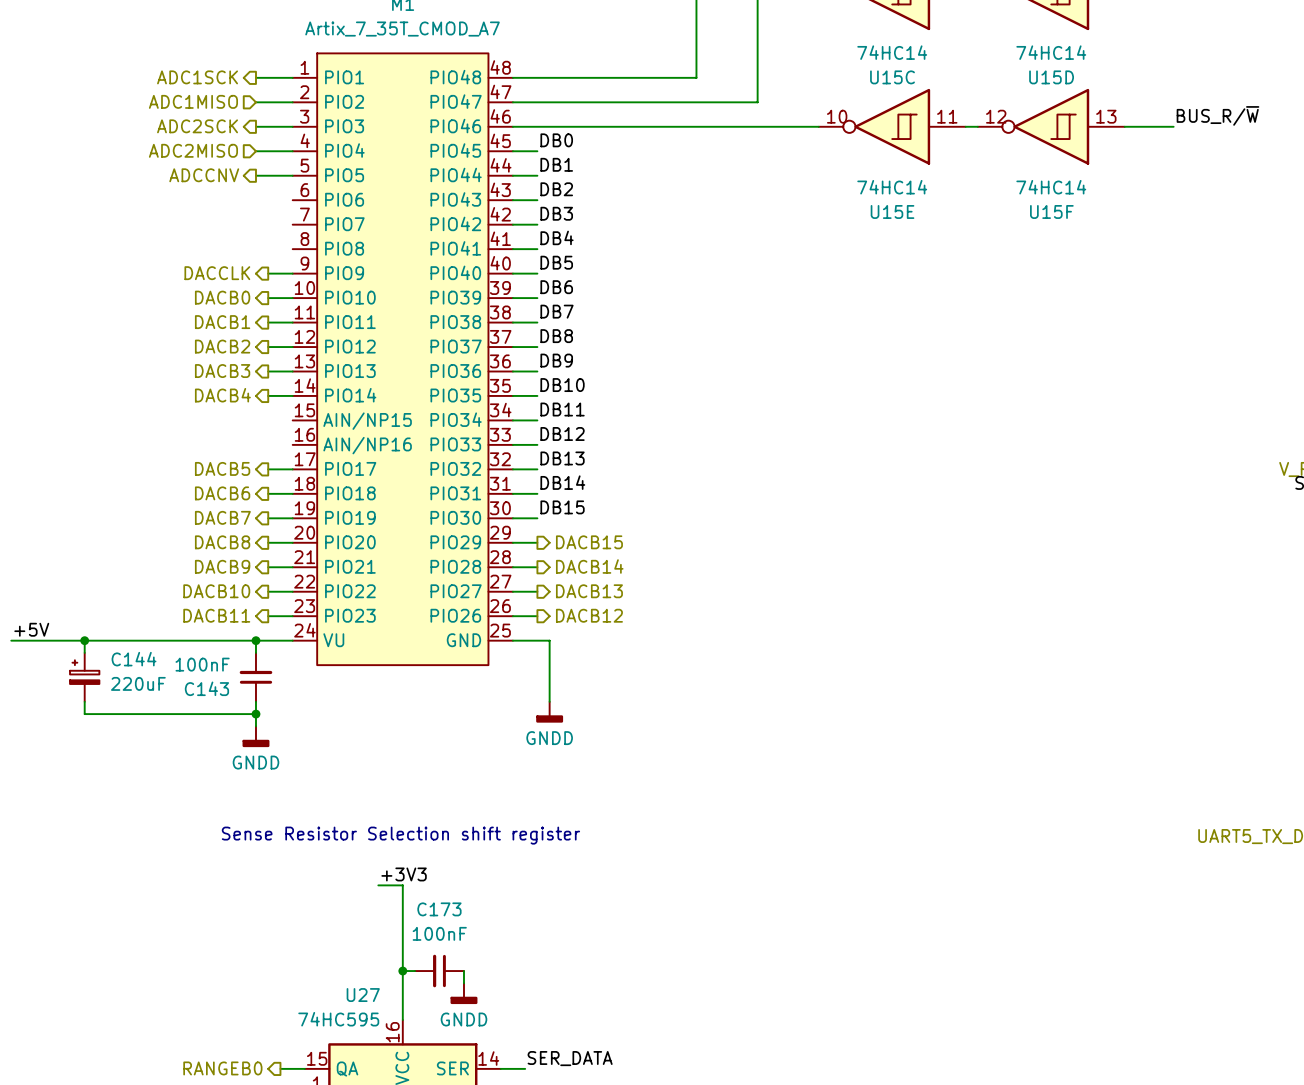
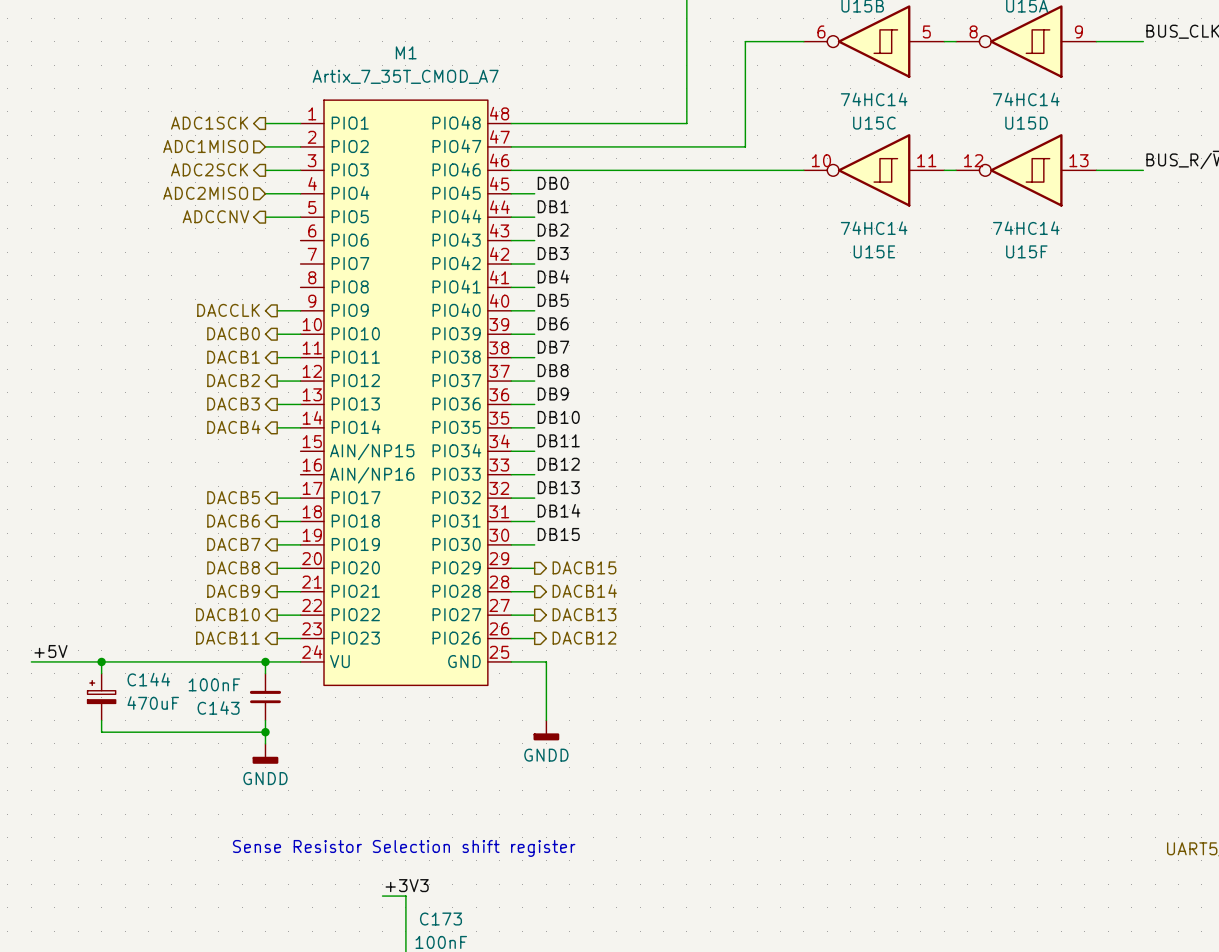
C144 value: 220uF (138, 683) -> 470uF (153, 703)

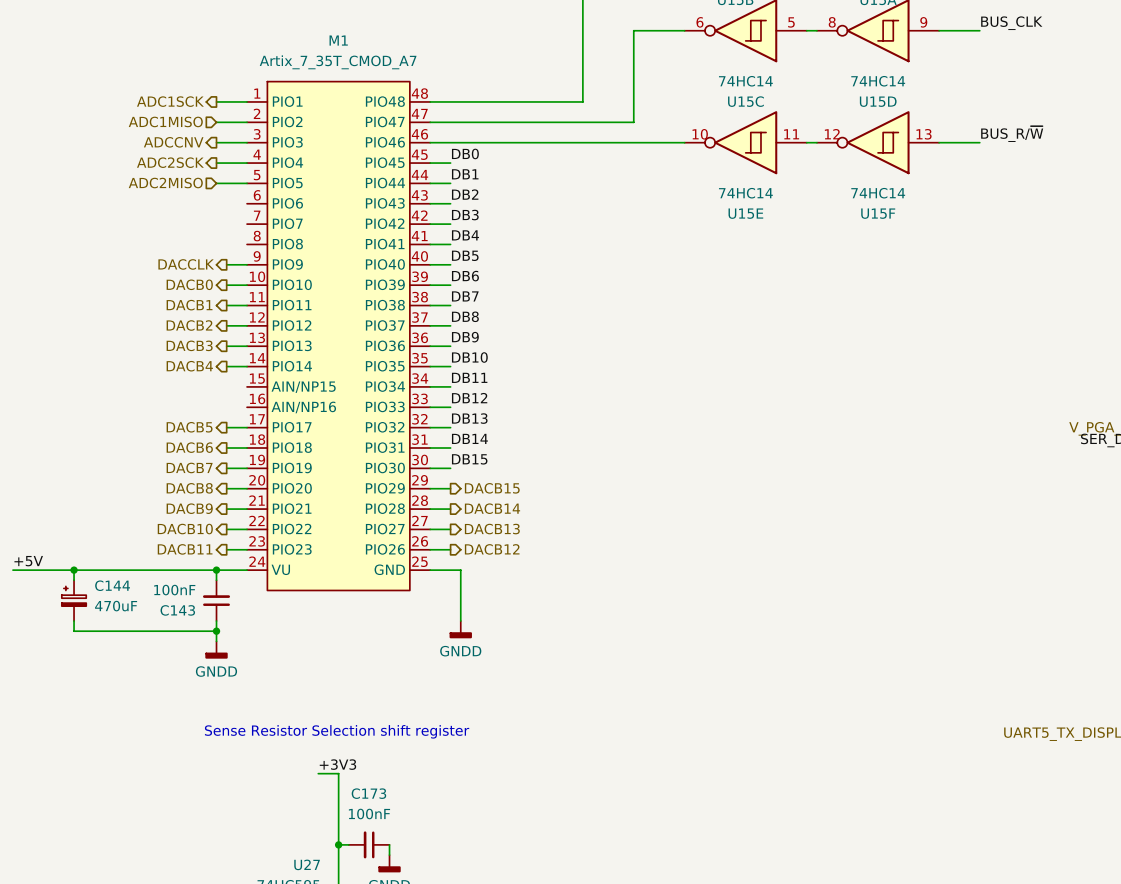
hierarchical label: ADC2SCK (209, 169) -> ADCCNV (173, 142)
hierarchical label shape: input (205, 193) -> output (170, 162)
hierarchical label: ADC2MISO (205, 193) -> ADC2SCK (170, 162)
hierarchical label shape: output (215, 216) -> input (165, 183)
hierarchical label: ADCCNV (215, 216) -> ADC2MISO (165, 183)

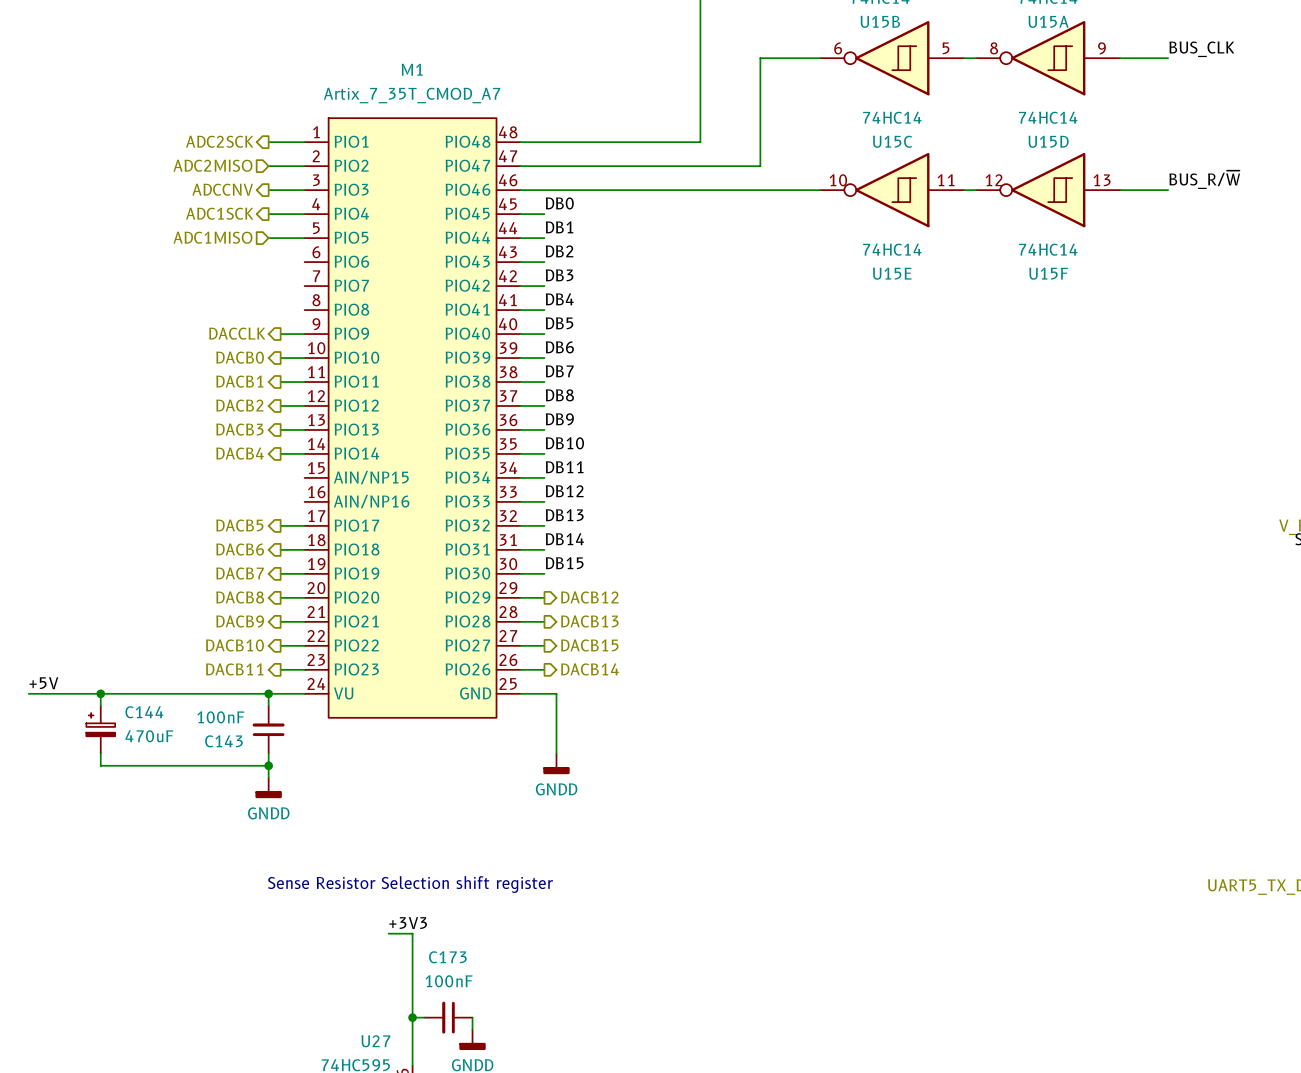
hierarchical label: ADC1SCK (170, 101) -> ADC2SCK (219, 141)
hierarchical label: ADC1MISO (165, 121) -> ADC2MISO (212, 165)
hierarchical label: ADC2SCK (170, 162) -> ADC1SCK (219, 213)
hierarchical label: ADC2MISO (165, 183) -> ADC1MISO (212, 237)
hierarchical label: DACB15 (492, 488) -> DACB12 (589, 597)
hierarchical label: DACB14 (492, 508) -> DACB13 (589, 621)
hierarchical label: DACB13 (492, 529) -> DACB15 (589, 645)
hierarchical label: DACB12 (492, 549) -> DACB14 (589, 669)

